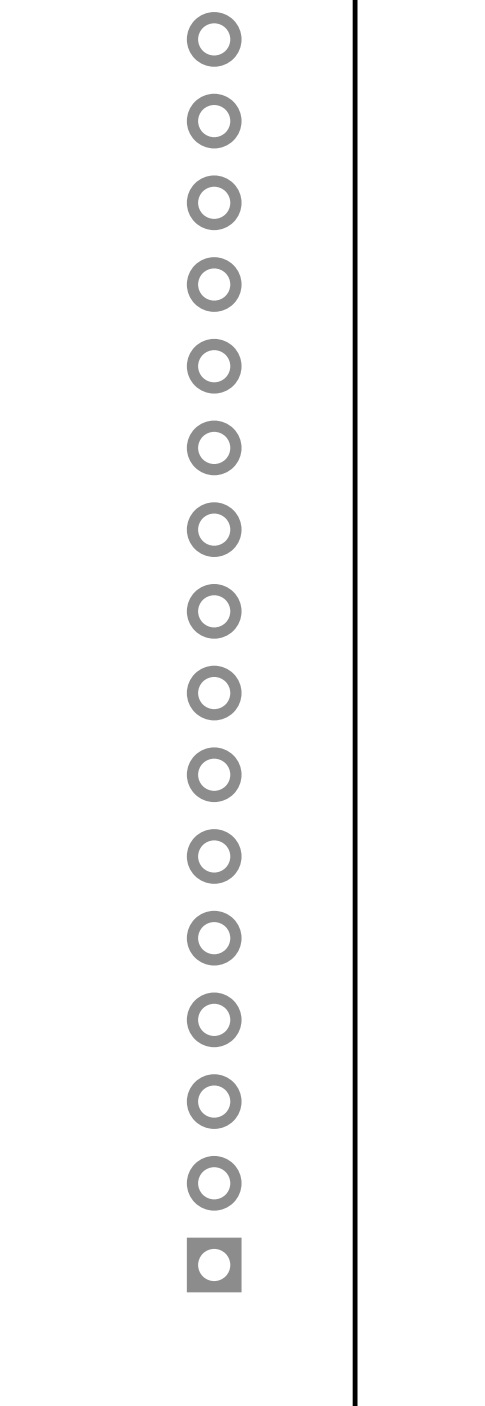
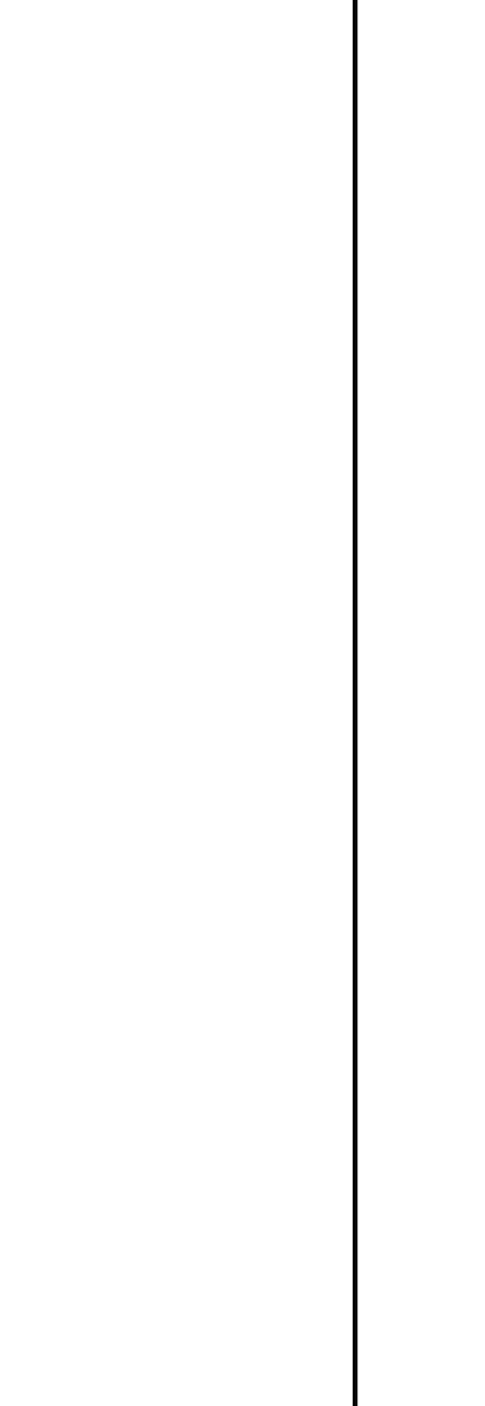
part: (214, 652) -> none

